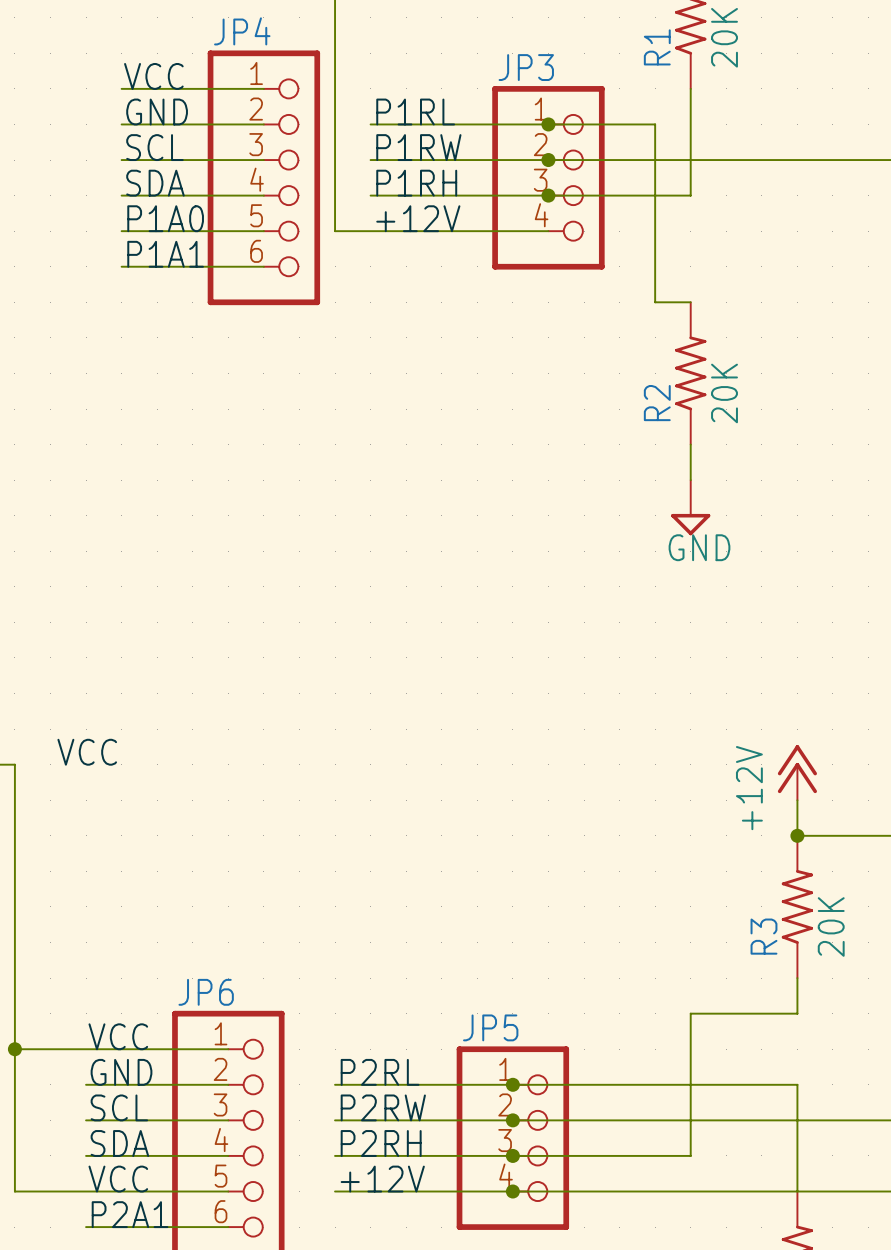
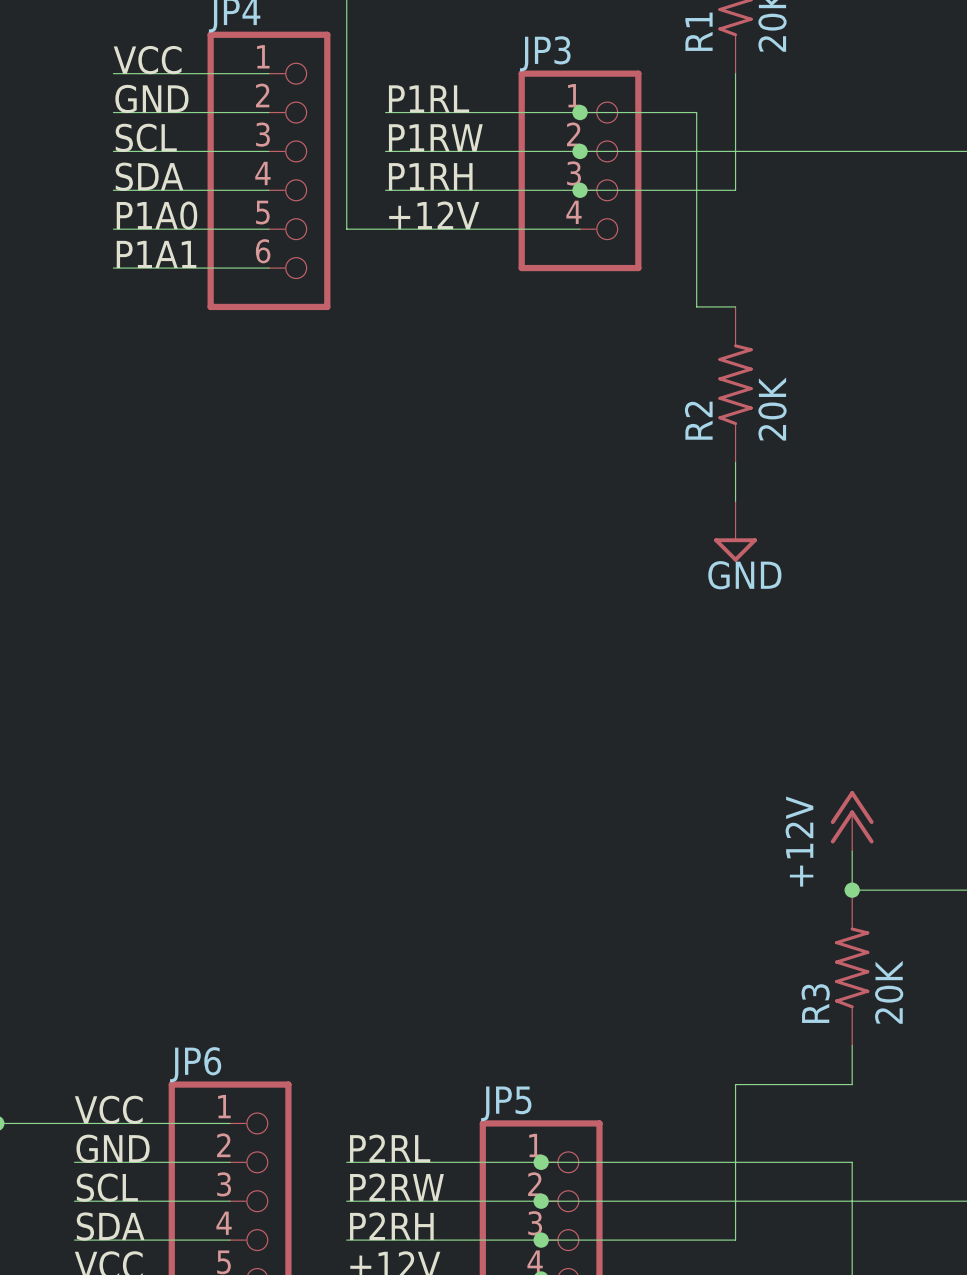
label: VCC (87, 752) -> none

